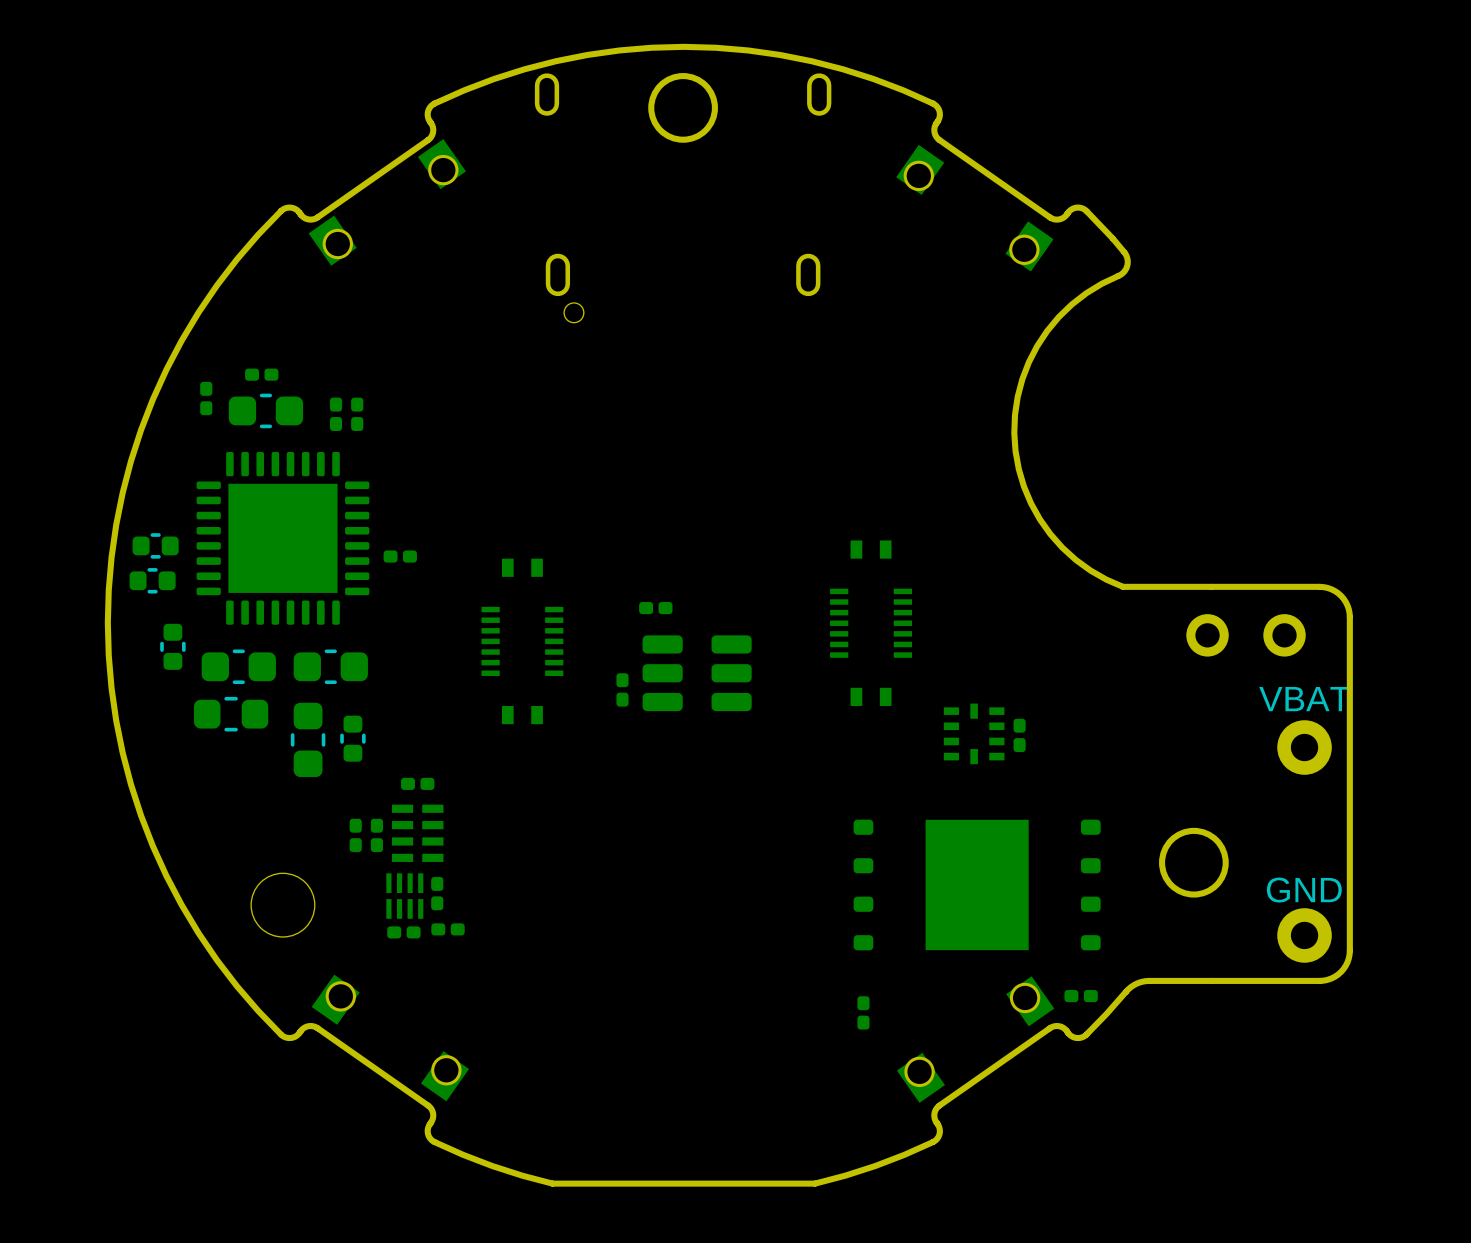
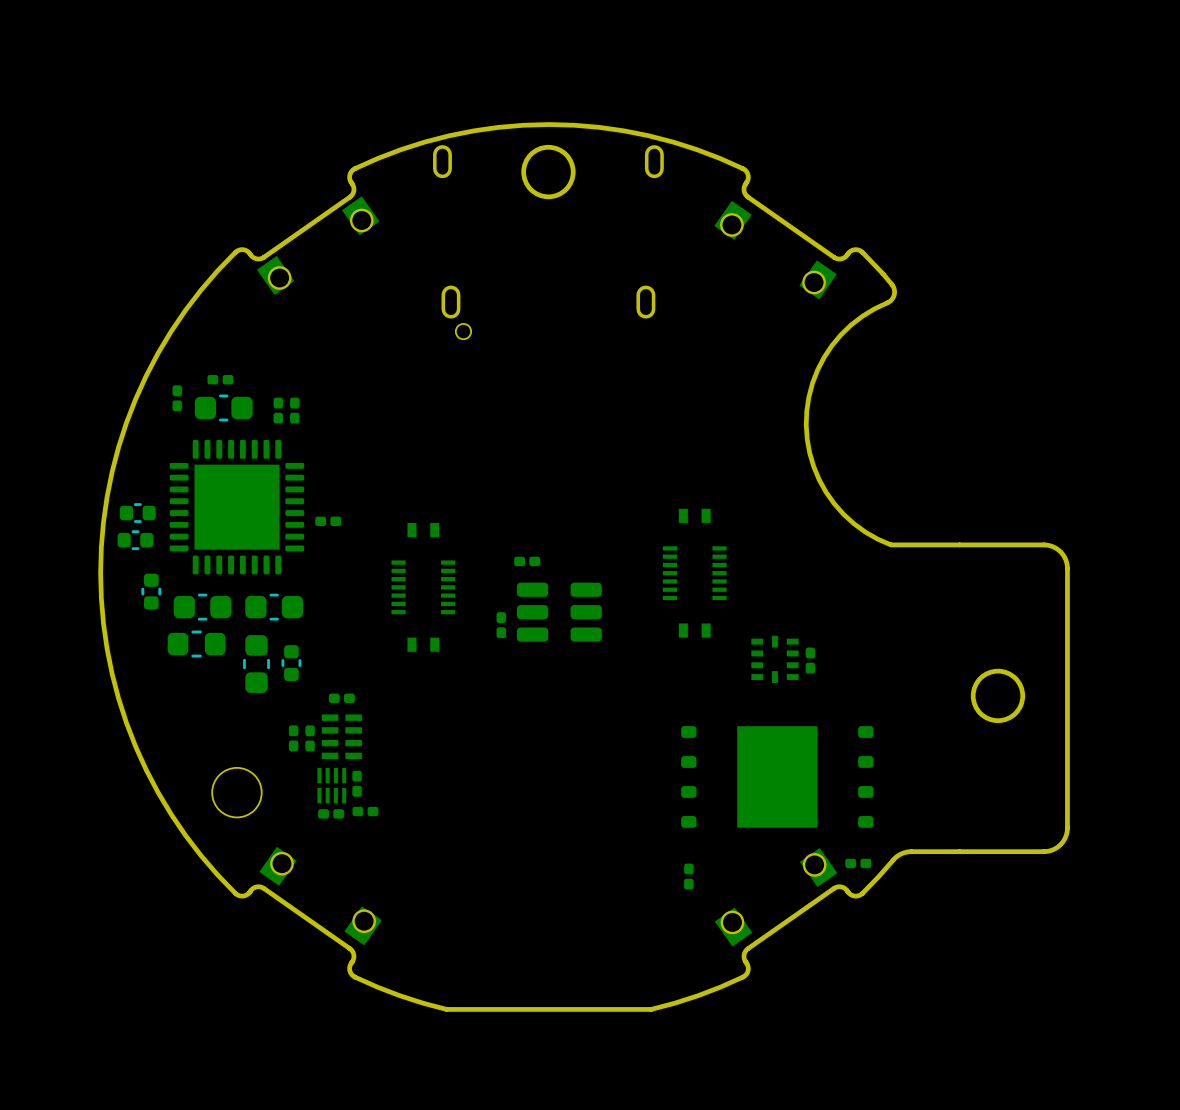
part: (1246, 635) -> none
text: VBAT (1304, 699) -> none
part: (1304, 747) -> none
round board edge position: (1193, 862) -> (997, 695)
text: GND (1304, 890) -> none
part: (1304, 935) -> none

